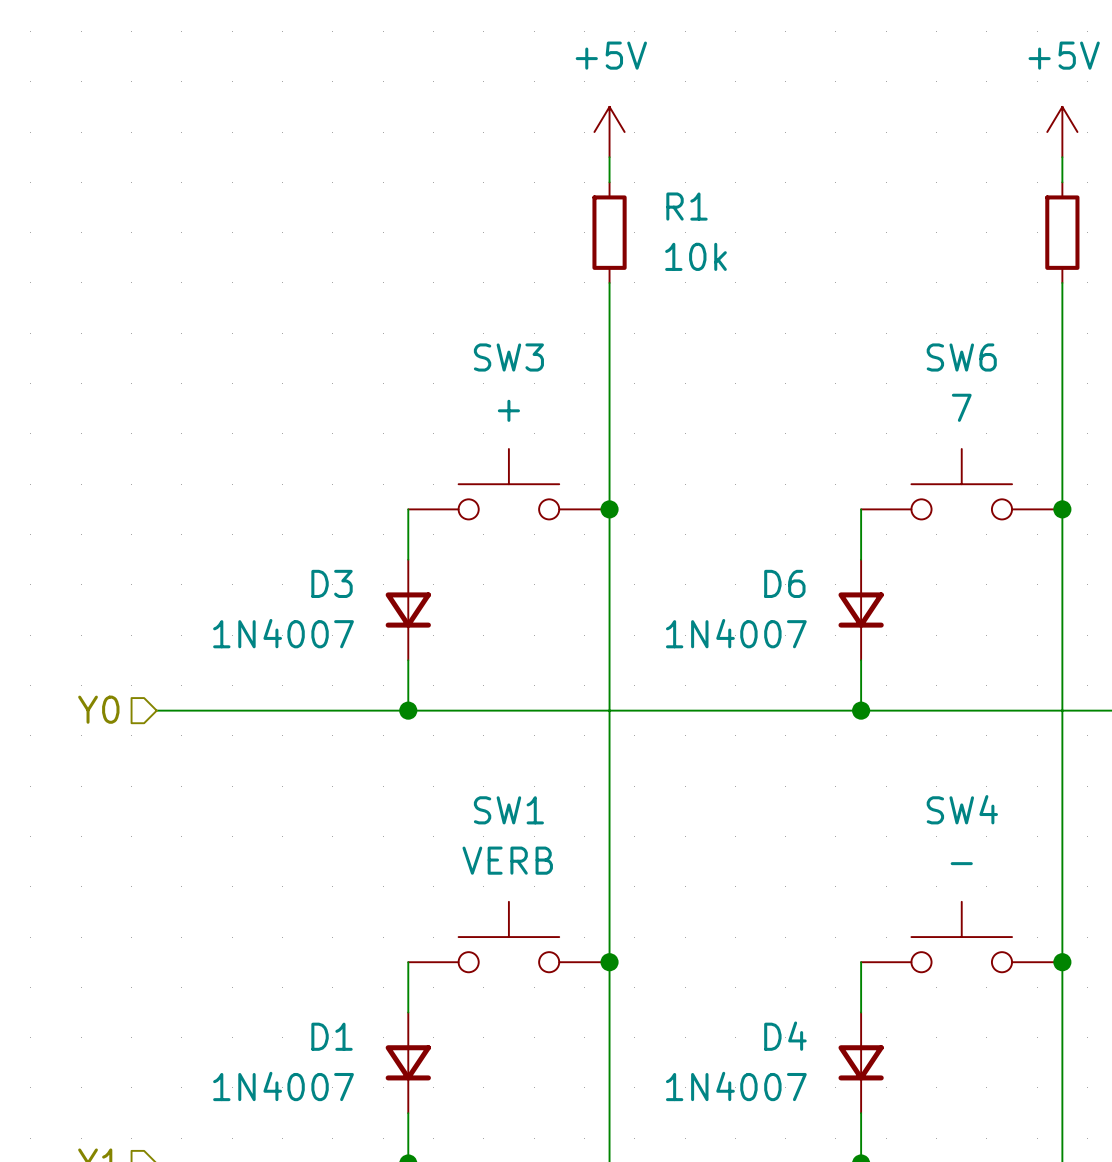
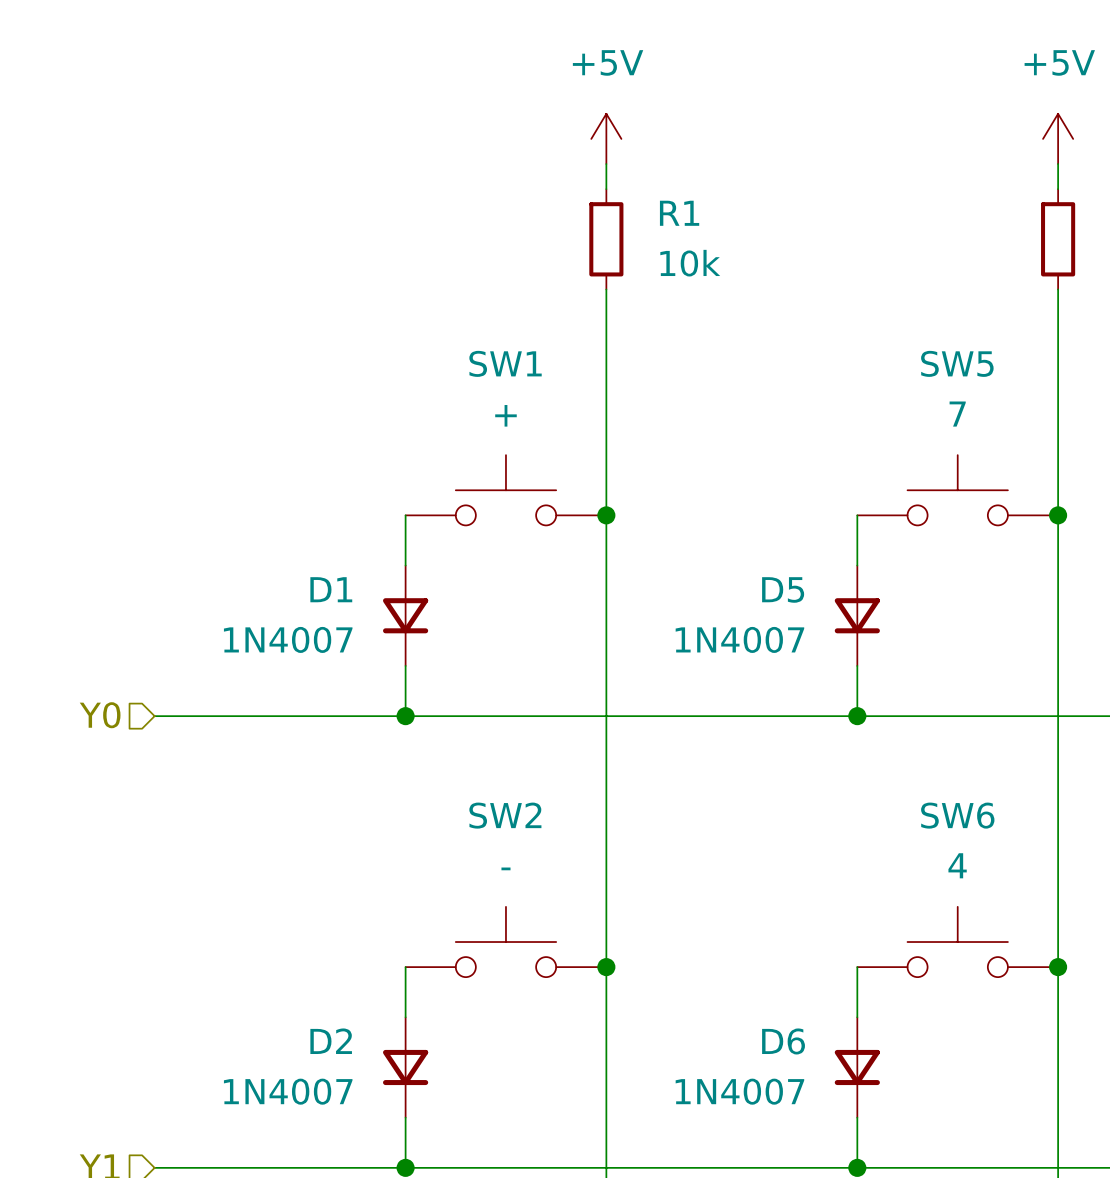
SW3 name: SW3 (508, 357) -> SW1 (505, 363)
SW6 name: SW6 (961, 357) -> SW5 (957, 363)
D3 name: D3 (332, 583) -> D1 (331, 589)
D6 name: D6 (784, 583) -> D5 (783, 589)
SW4 name: SW4 (962, 809) -> SW6 (957, 815)
SW1 name: SW1 (508, 810) -> SW2 (505, 815)
SW1 value: VERB (507, 860) -> - (505, 868)
SW4 value: - (961, 863) -> 4 (957, 865)
D1 name: D1 (332, 1036) -> D2 (331, 1041)
D4 name: D4 (785, 1036) -> D6 (783, 1041)

